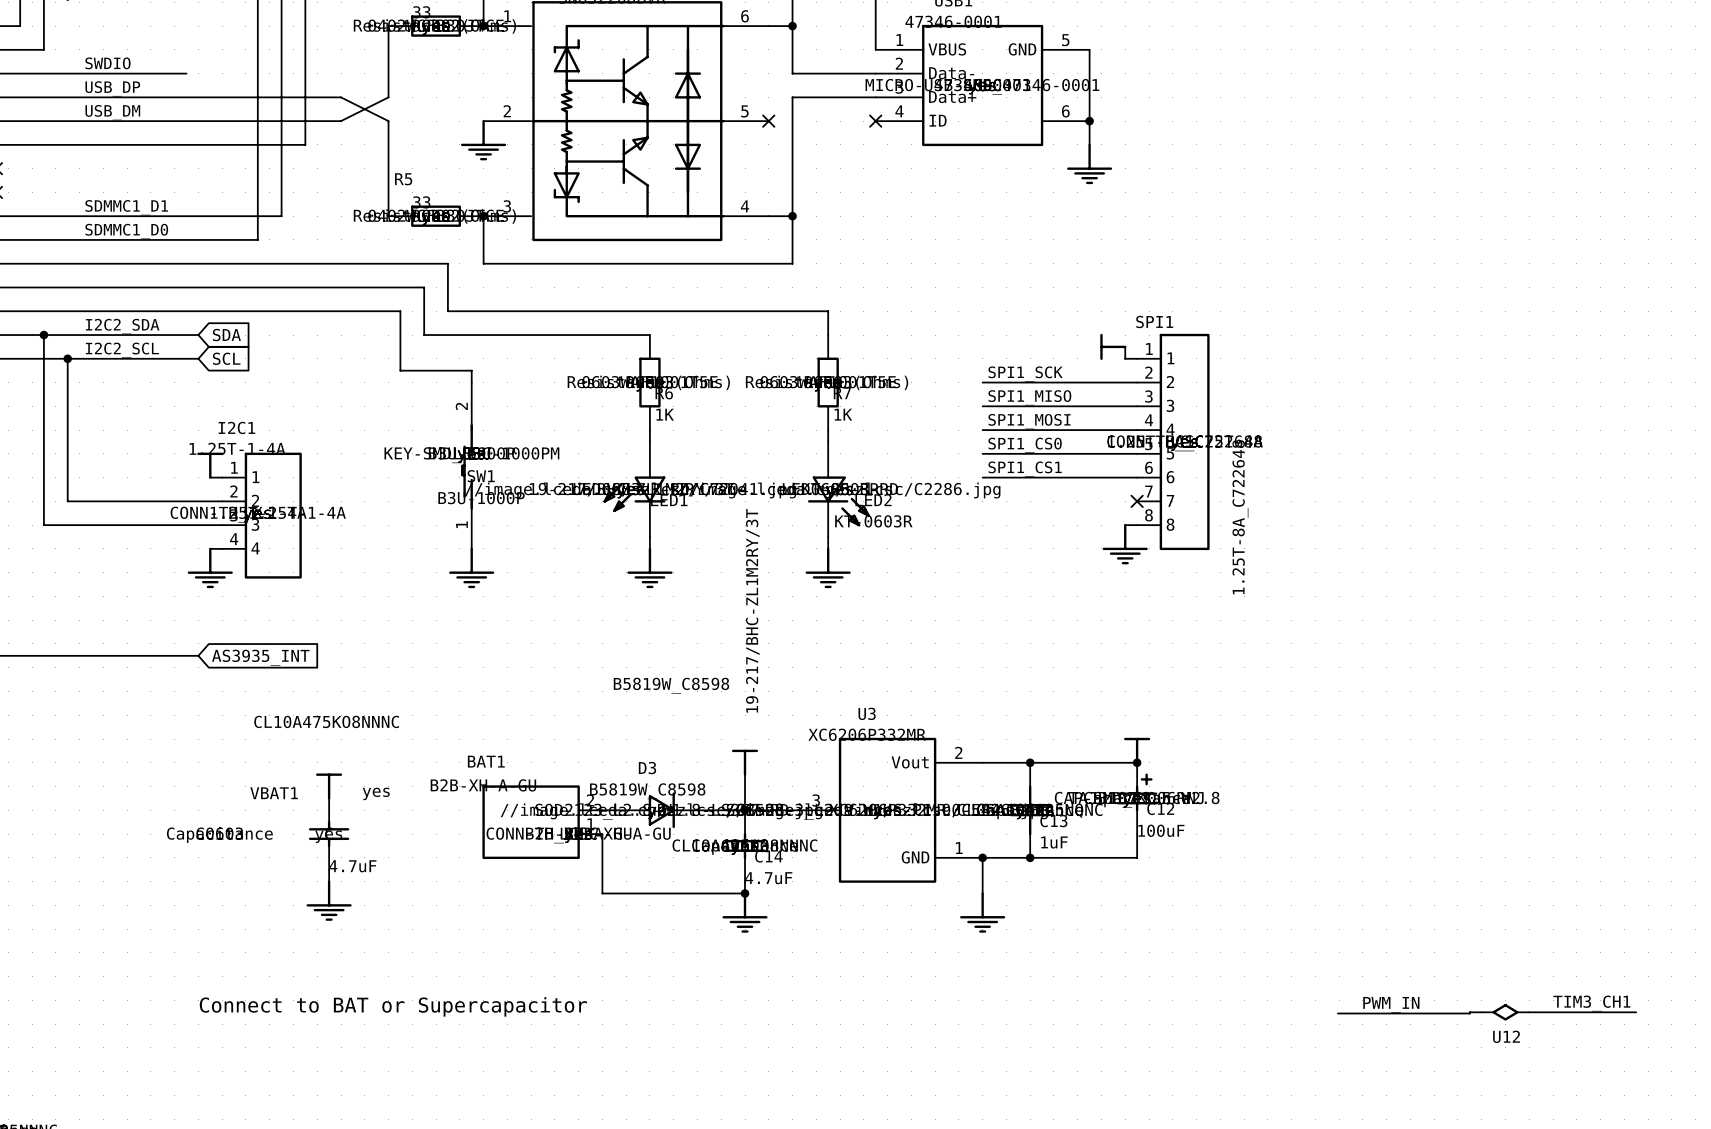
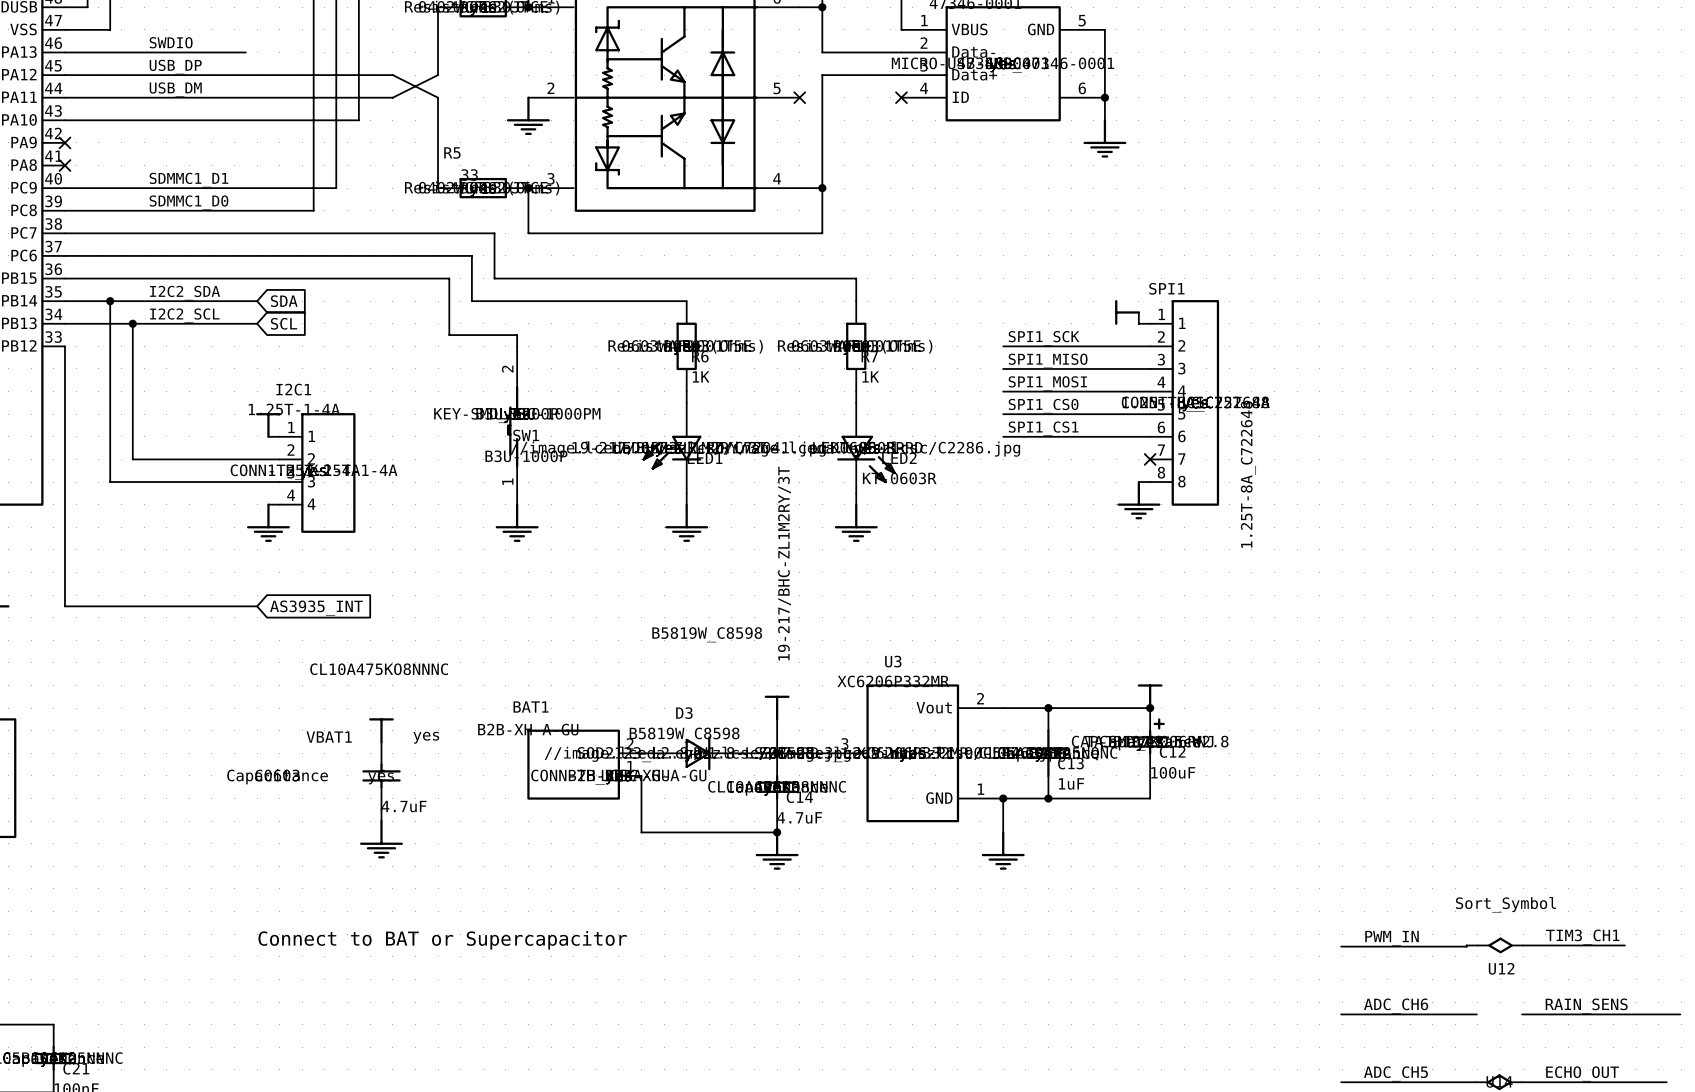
U12 value: none -> Sort_Symbol (1505, 904)
label: none -> ADC_CH6 (1396, 1006)
label: none -> RAIN_SENS (1586, 1006)
wire: none -> (1341, 1014) (1476, 1014)
wire: none -> (1522, 1014) (1680, 1014)

